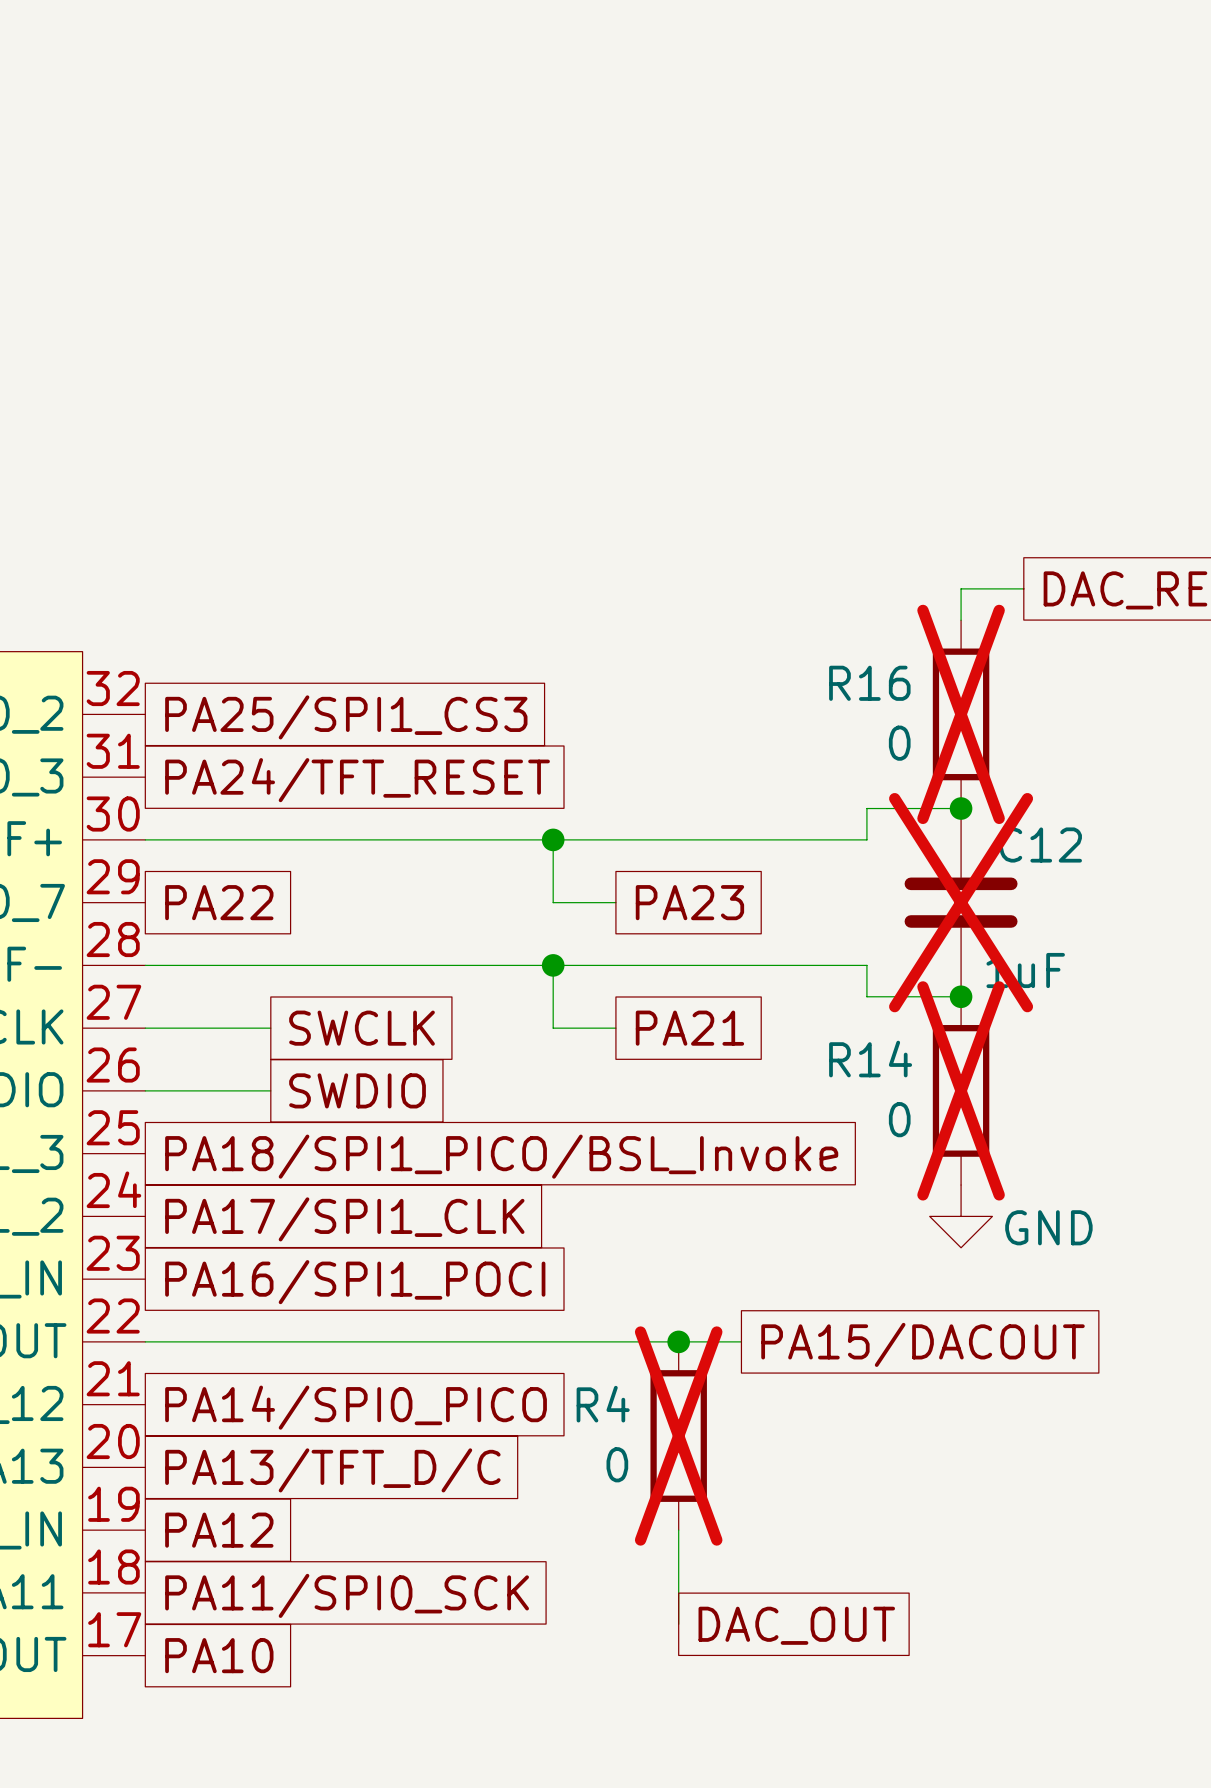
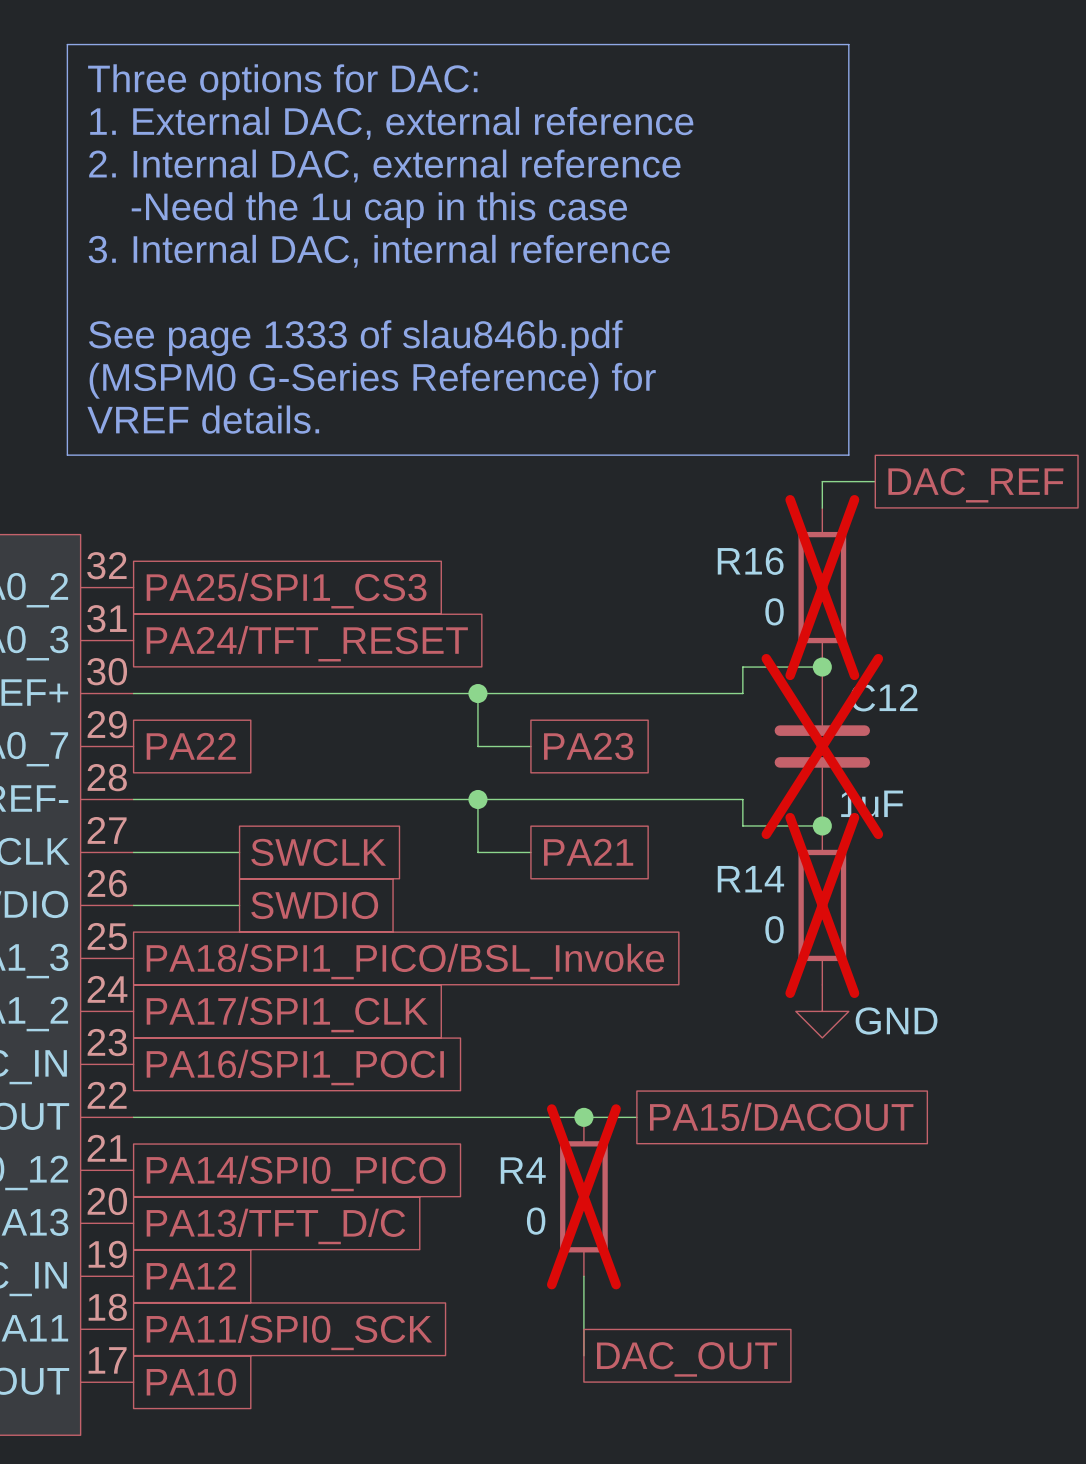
line: none -> (67, 44) (848, 44) (848, 455) (67, 455) (67, 44)
text: none -> Three options for DAC: (282, 82)
text: none -> 1. External DAC, external reference (391, 123)
text: none -> 2. Internal DAC, external reference (384, 165)
text: none -> -Need the 1u cap in this case (379, 210)
text: none -> 3. Internal DAC, internal reference (379, 251)
text: none -> See page 1333 of slau846b.pdf (355, 338)
text: none -> (MSPM0 G-Series Reference) for (372, 380)
text: none -> VREF details. (203, 419)

